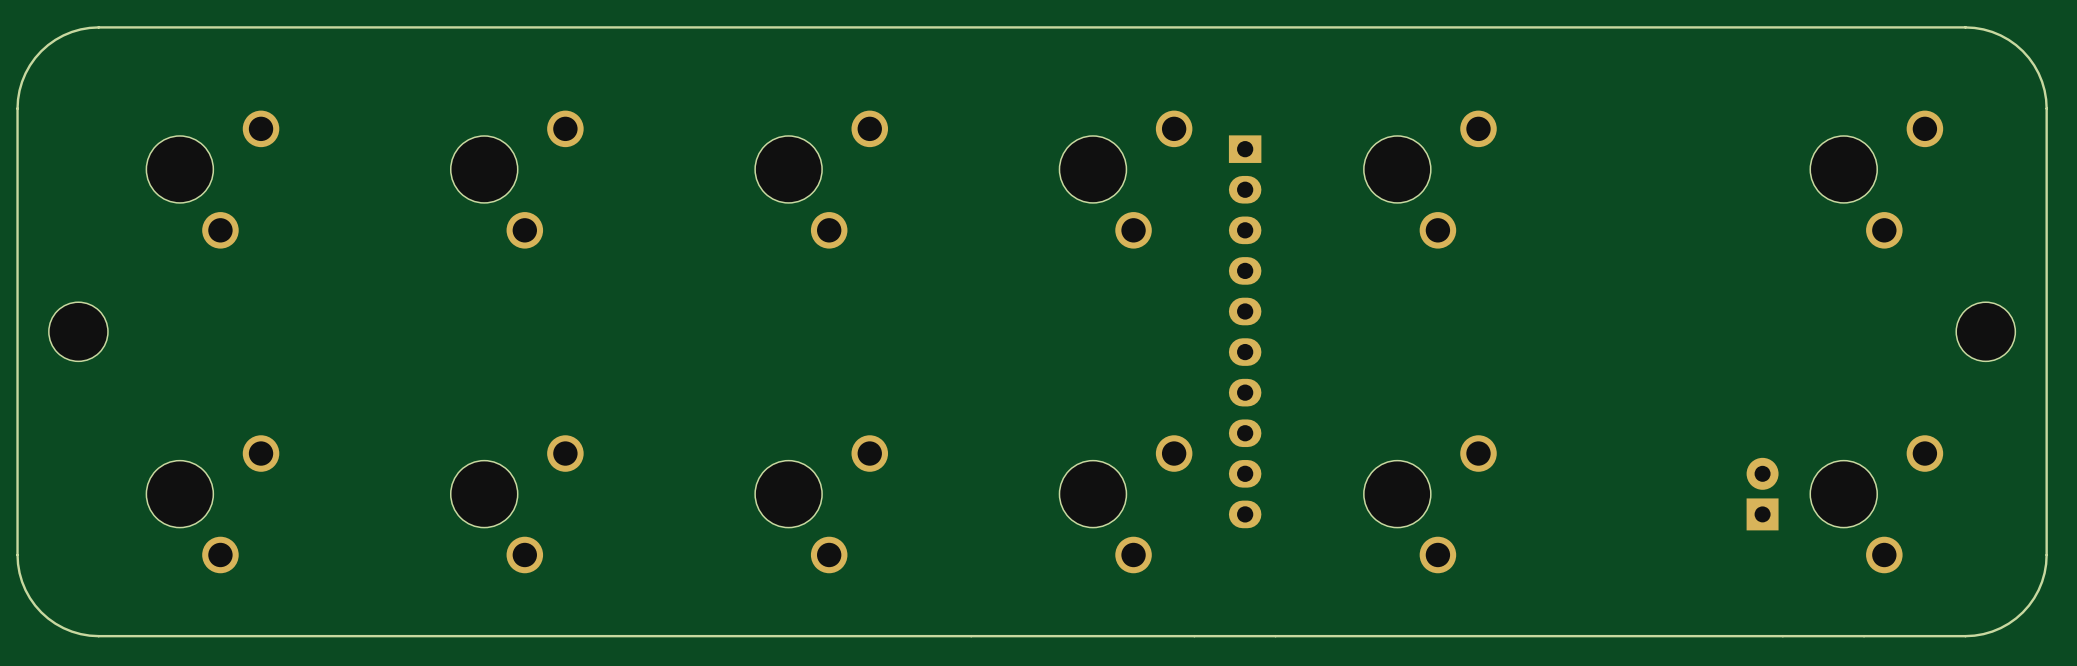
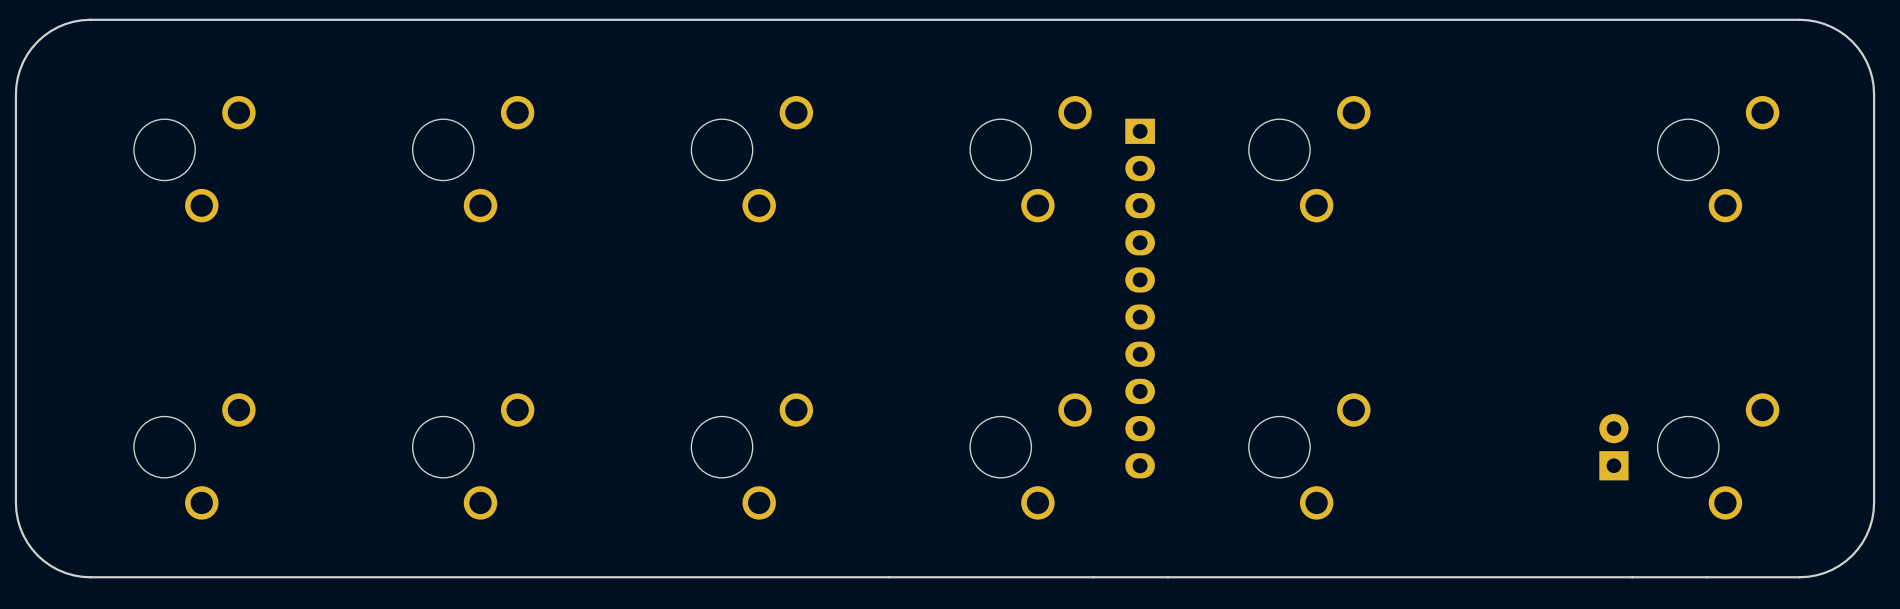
part: (78, 331) -> none
part: (1985, 331) -> none

